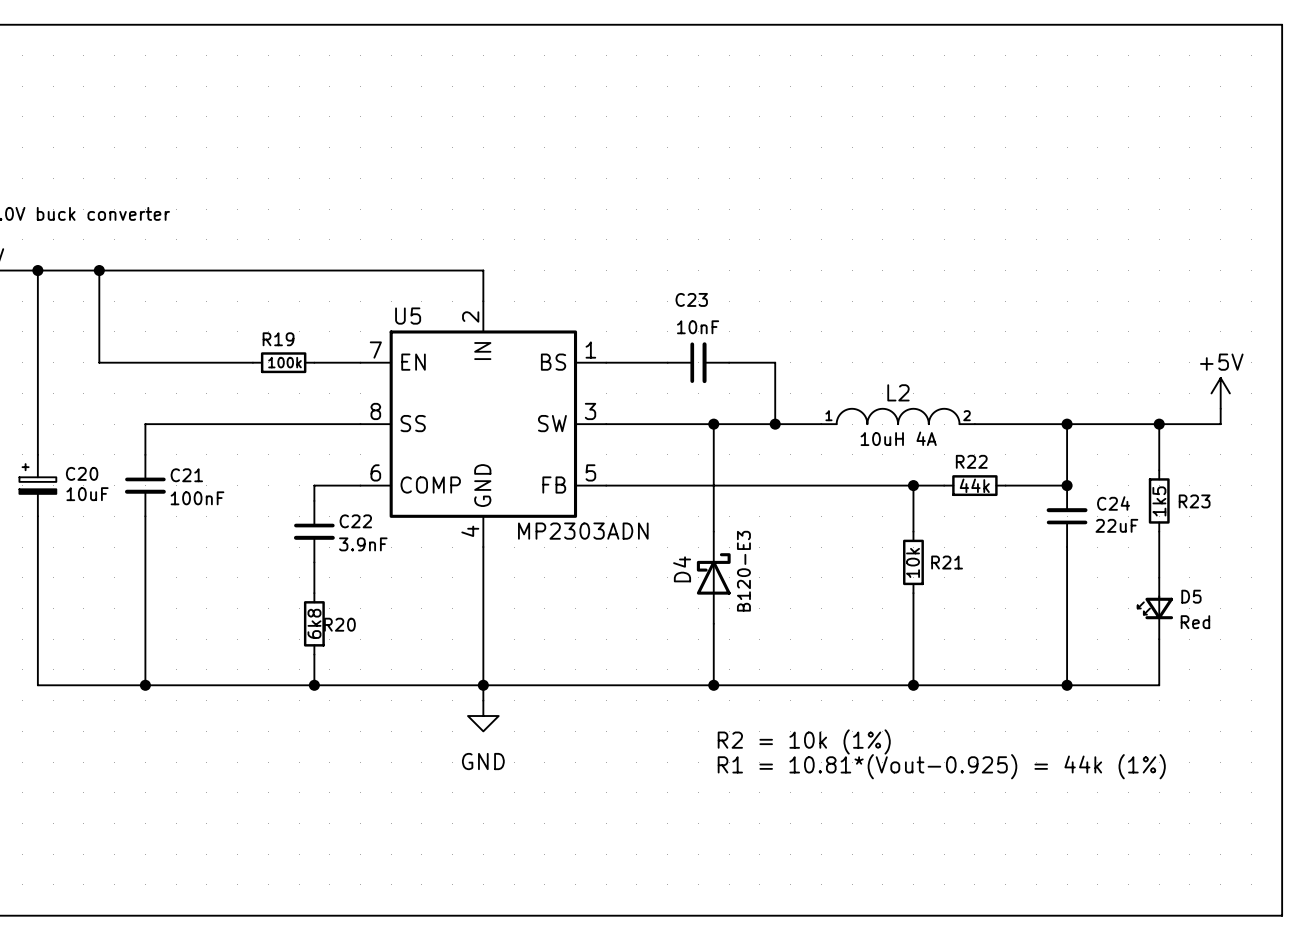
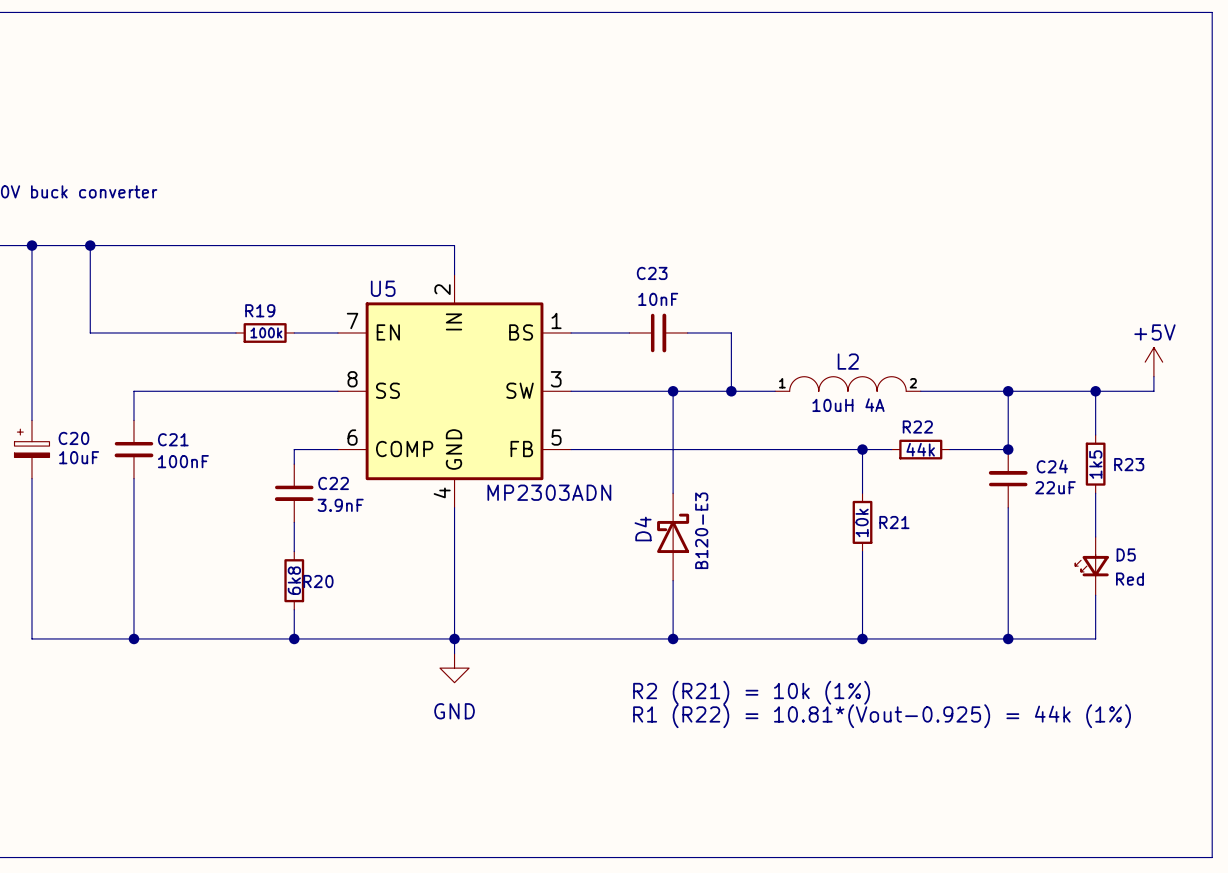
text: R2 = 10k (1%) (804, 741) -> R2 (R21) = 10k (1%) (751, 692)
text: R1 = 10.81*(Vout-0.925) = 44k (1%) (941, 766) -> R1 (R22) = 10.81*(Vout-0.925) = 44k (1%) (882, 716)

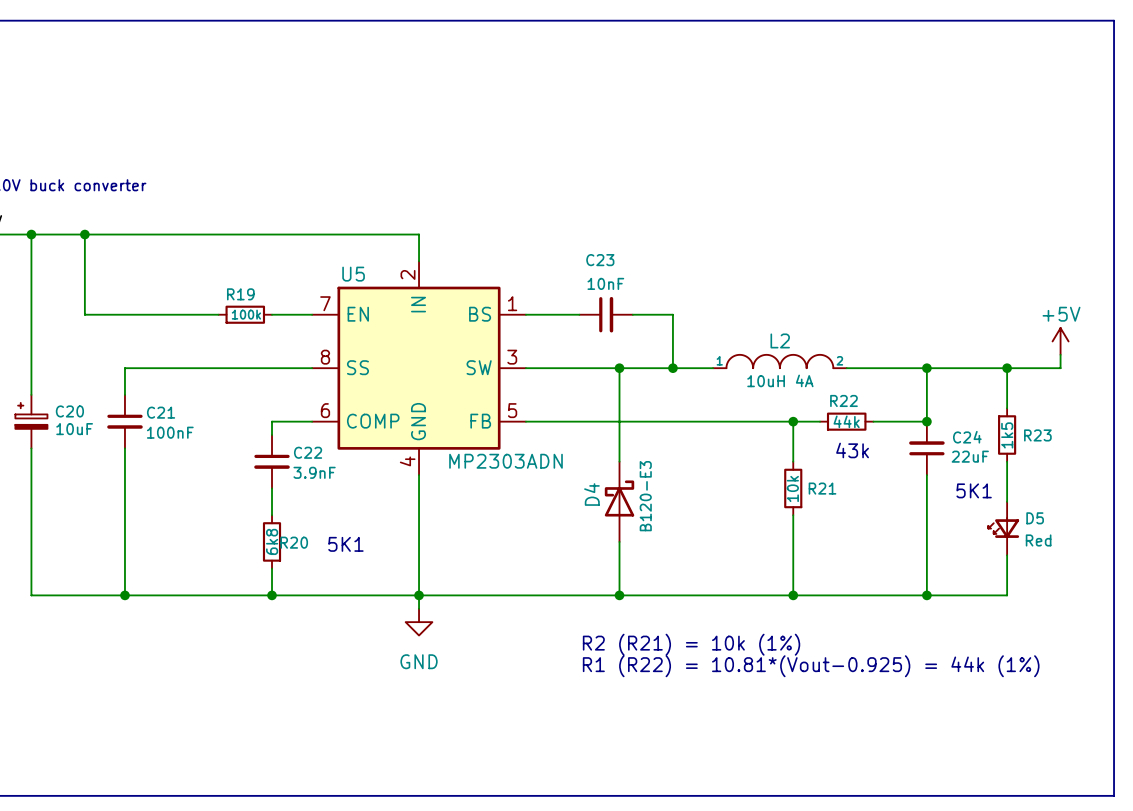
text: none -> 43k (852, 450)
text: none -> 5K1 (974, 490)
text: none -> 5K1 (345, 544)

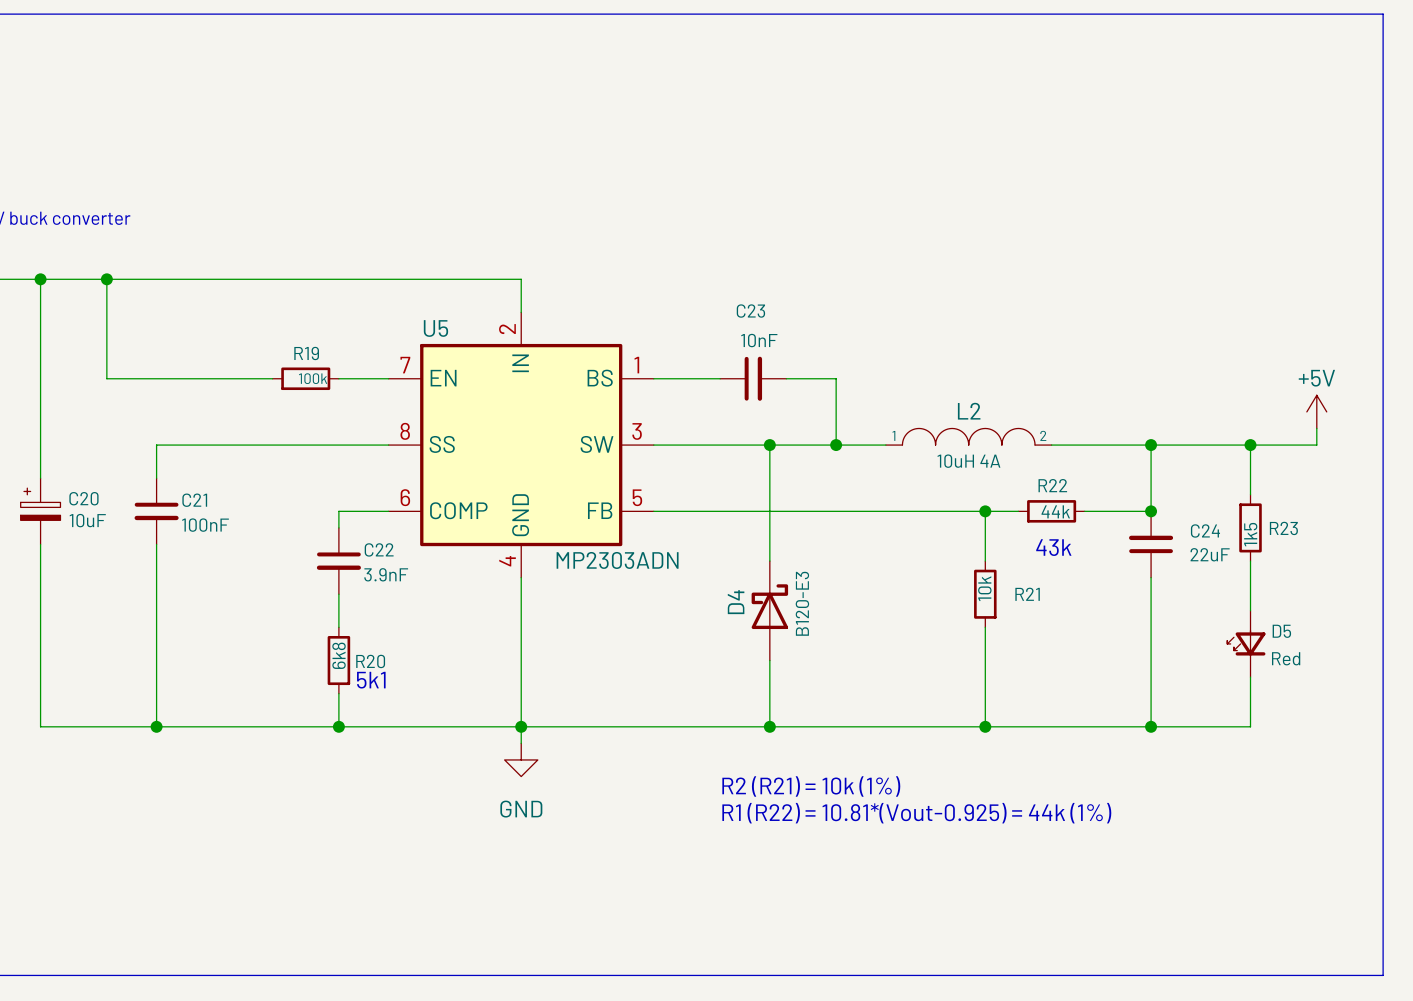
text: 5K1 (974, 490) -> none
text: 5K1 (345, 544) -> 5k1 (371, 680)

